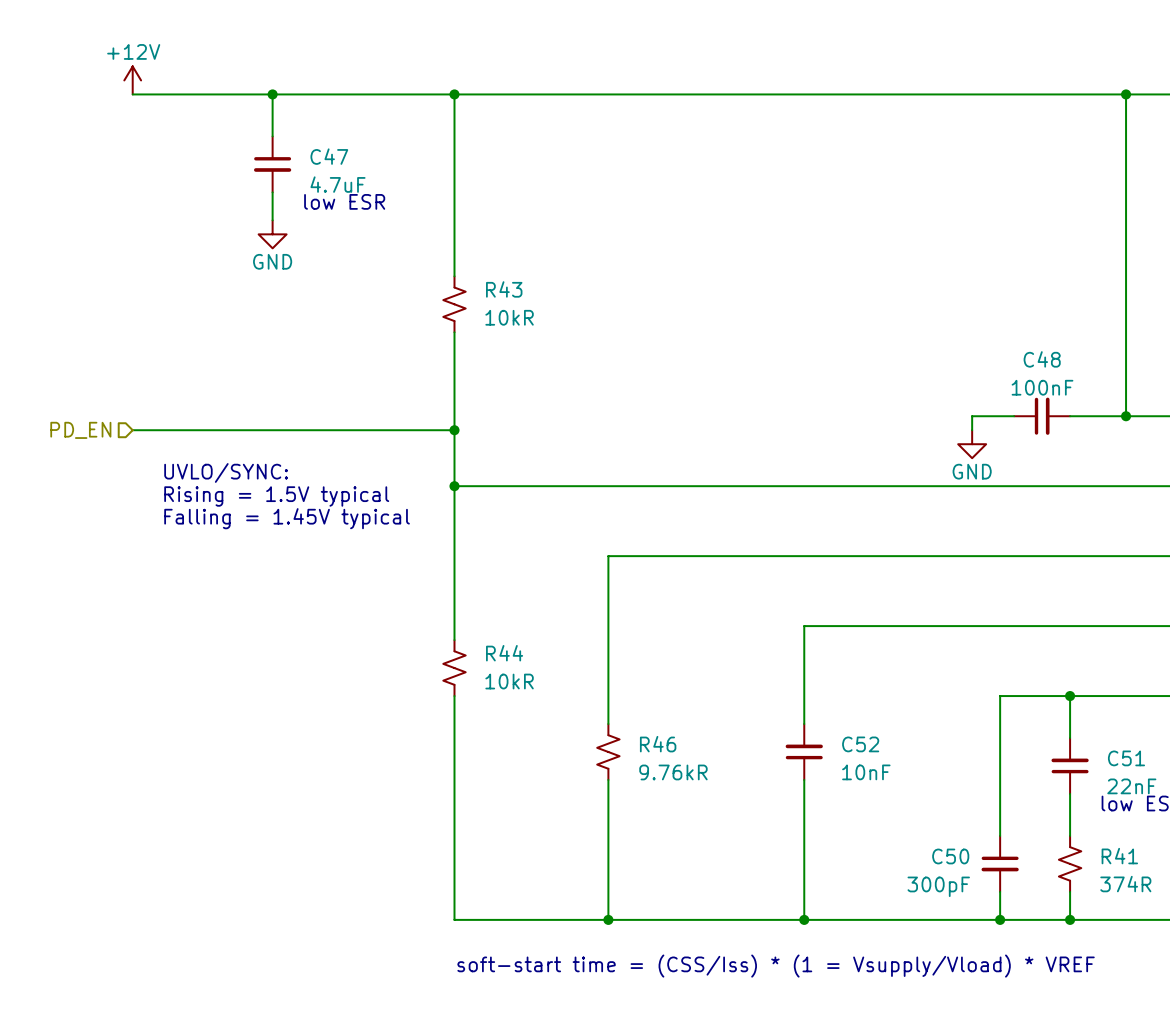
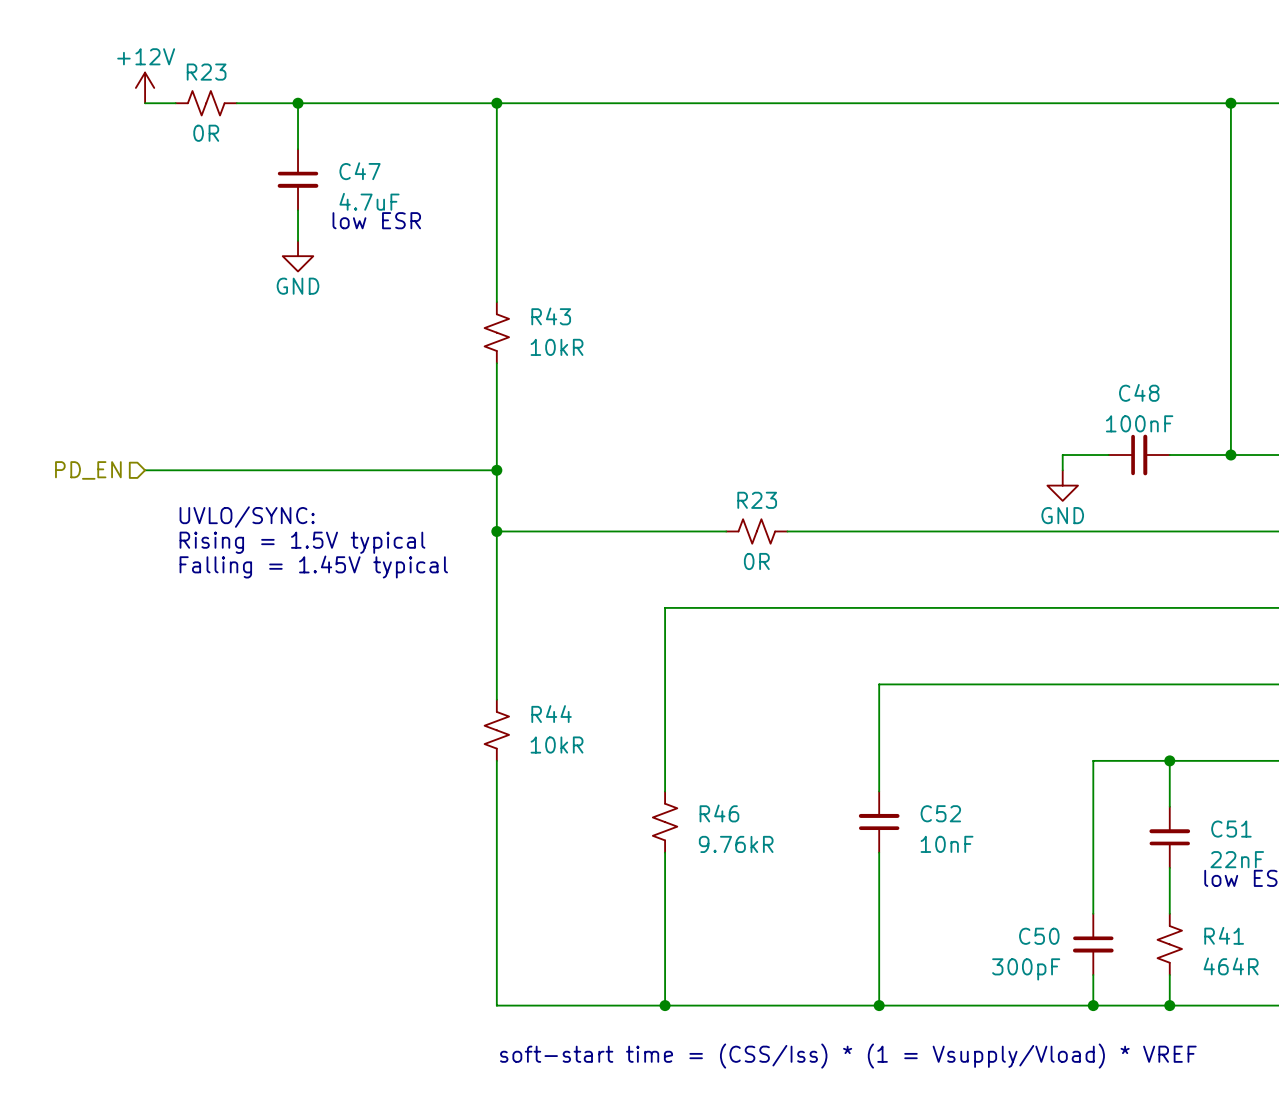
R23: none -> 0R (206, 103)
R23: none -> 0R (756, 531)
R41 value: 374R (1125, 884) -> 464R (1231, 966)

